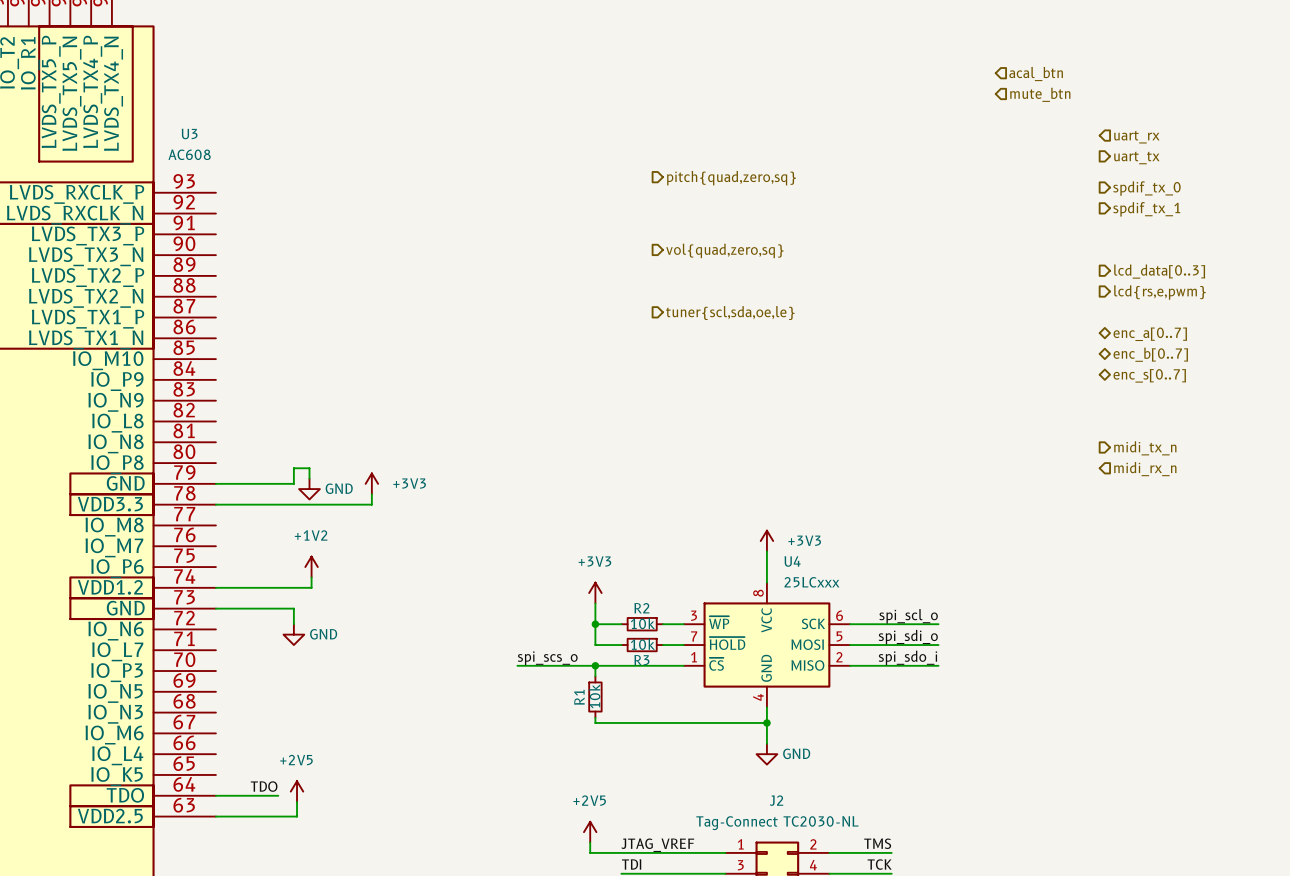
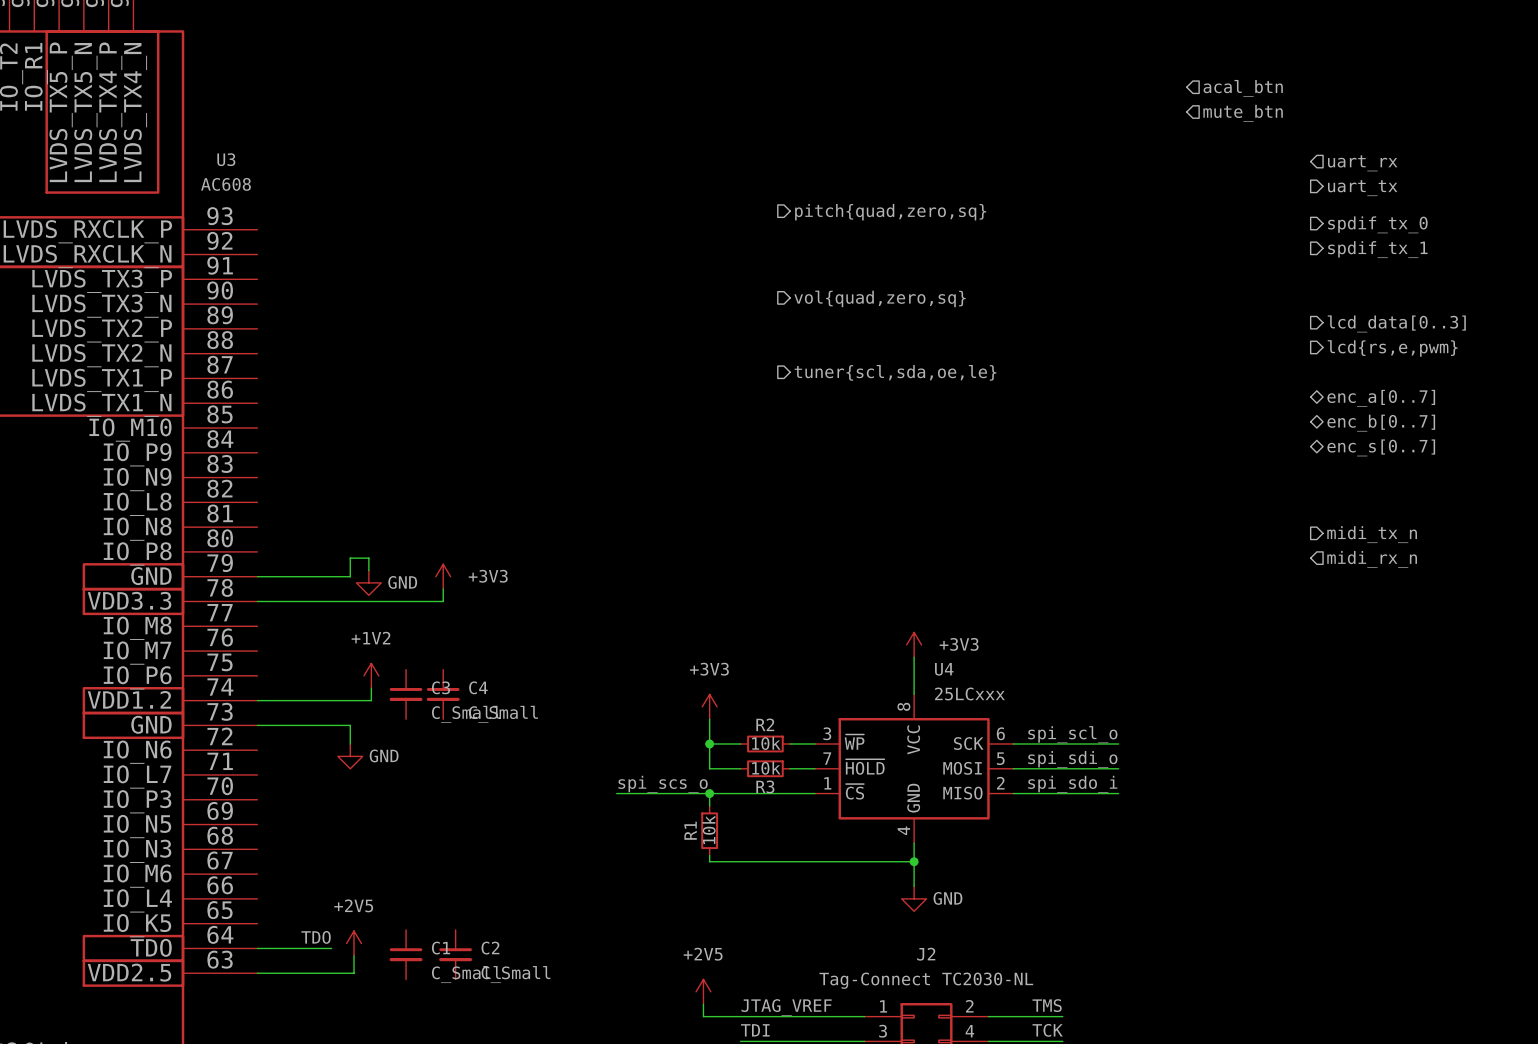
C3: none -> C_Small (406, 694)
C4: none -> C_Small (443, 694)
C1: none -> C_Small (406, 954)
C2: none -> C_Small (455, 954)

